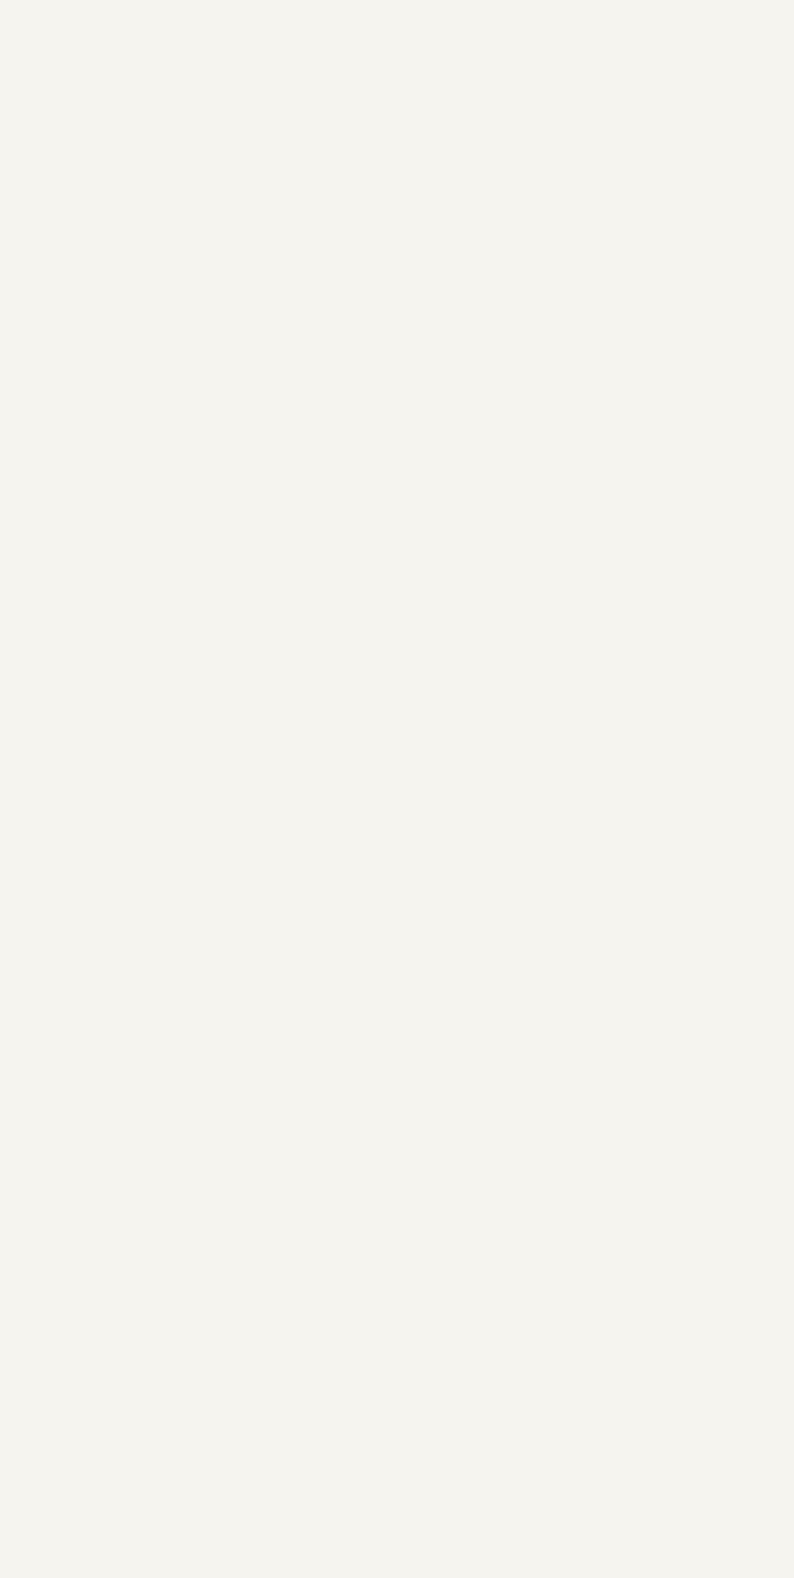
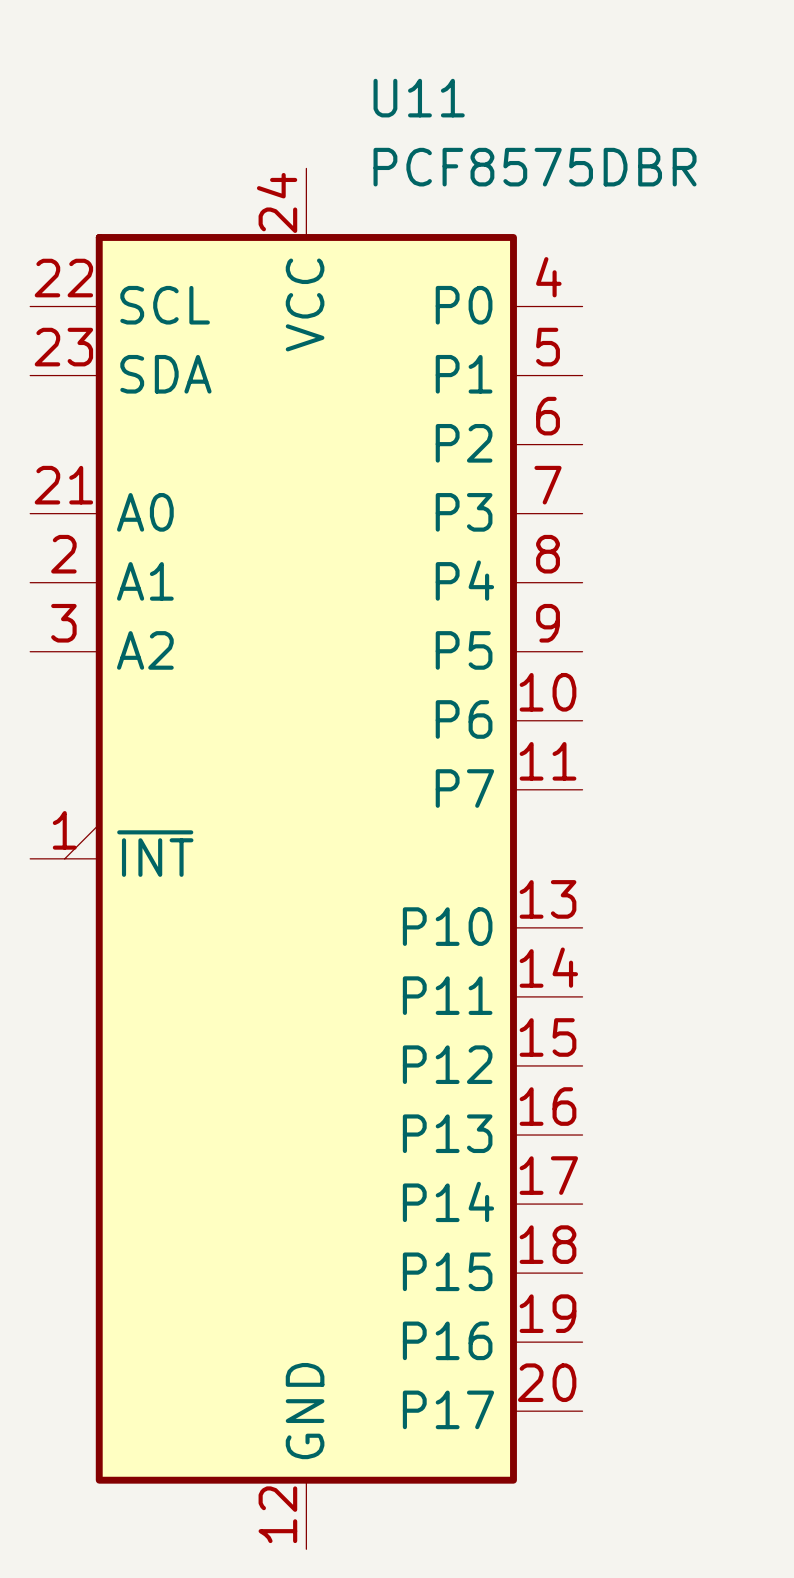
U11: none -> PCF8575DBR (306, 858)

